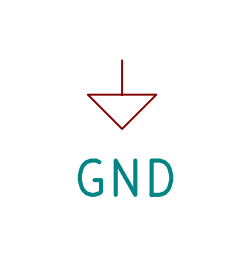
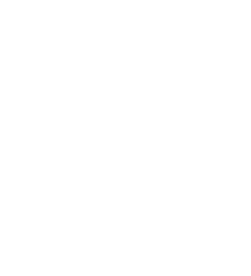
power symbol: GND (122, 94) -> none

